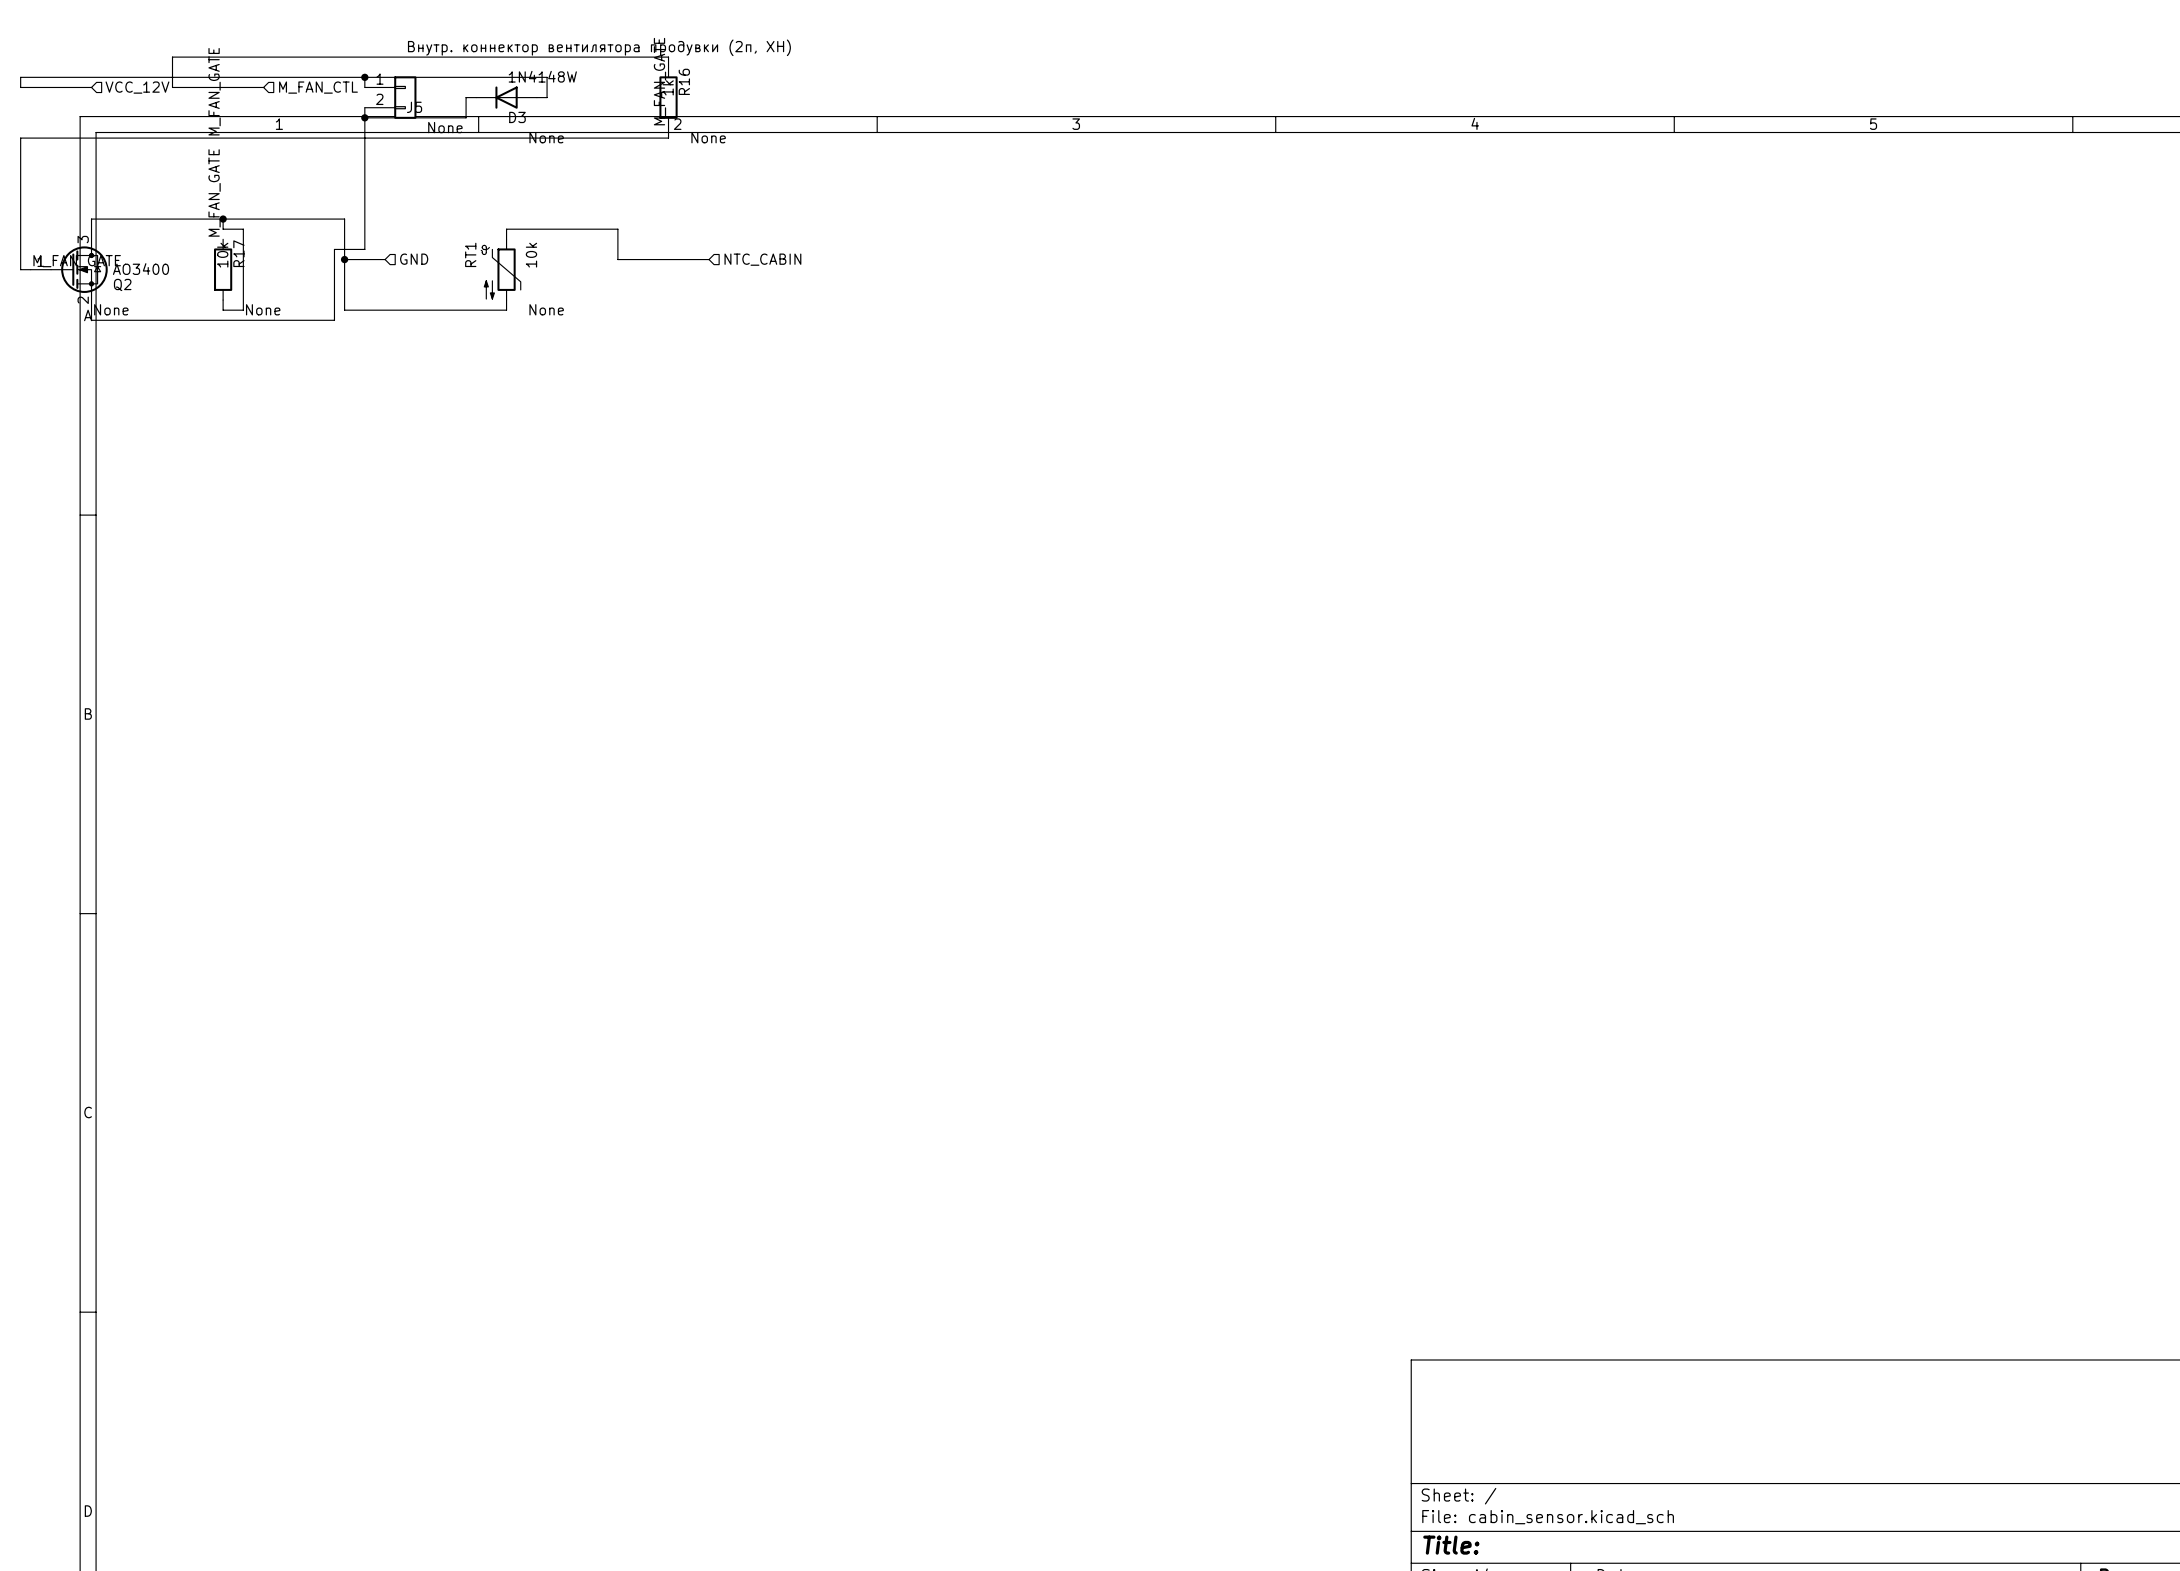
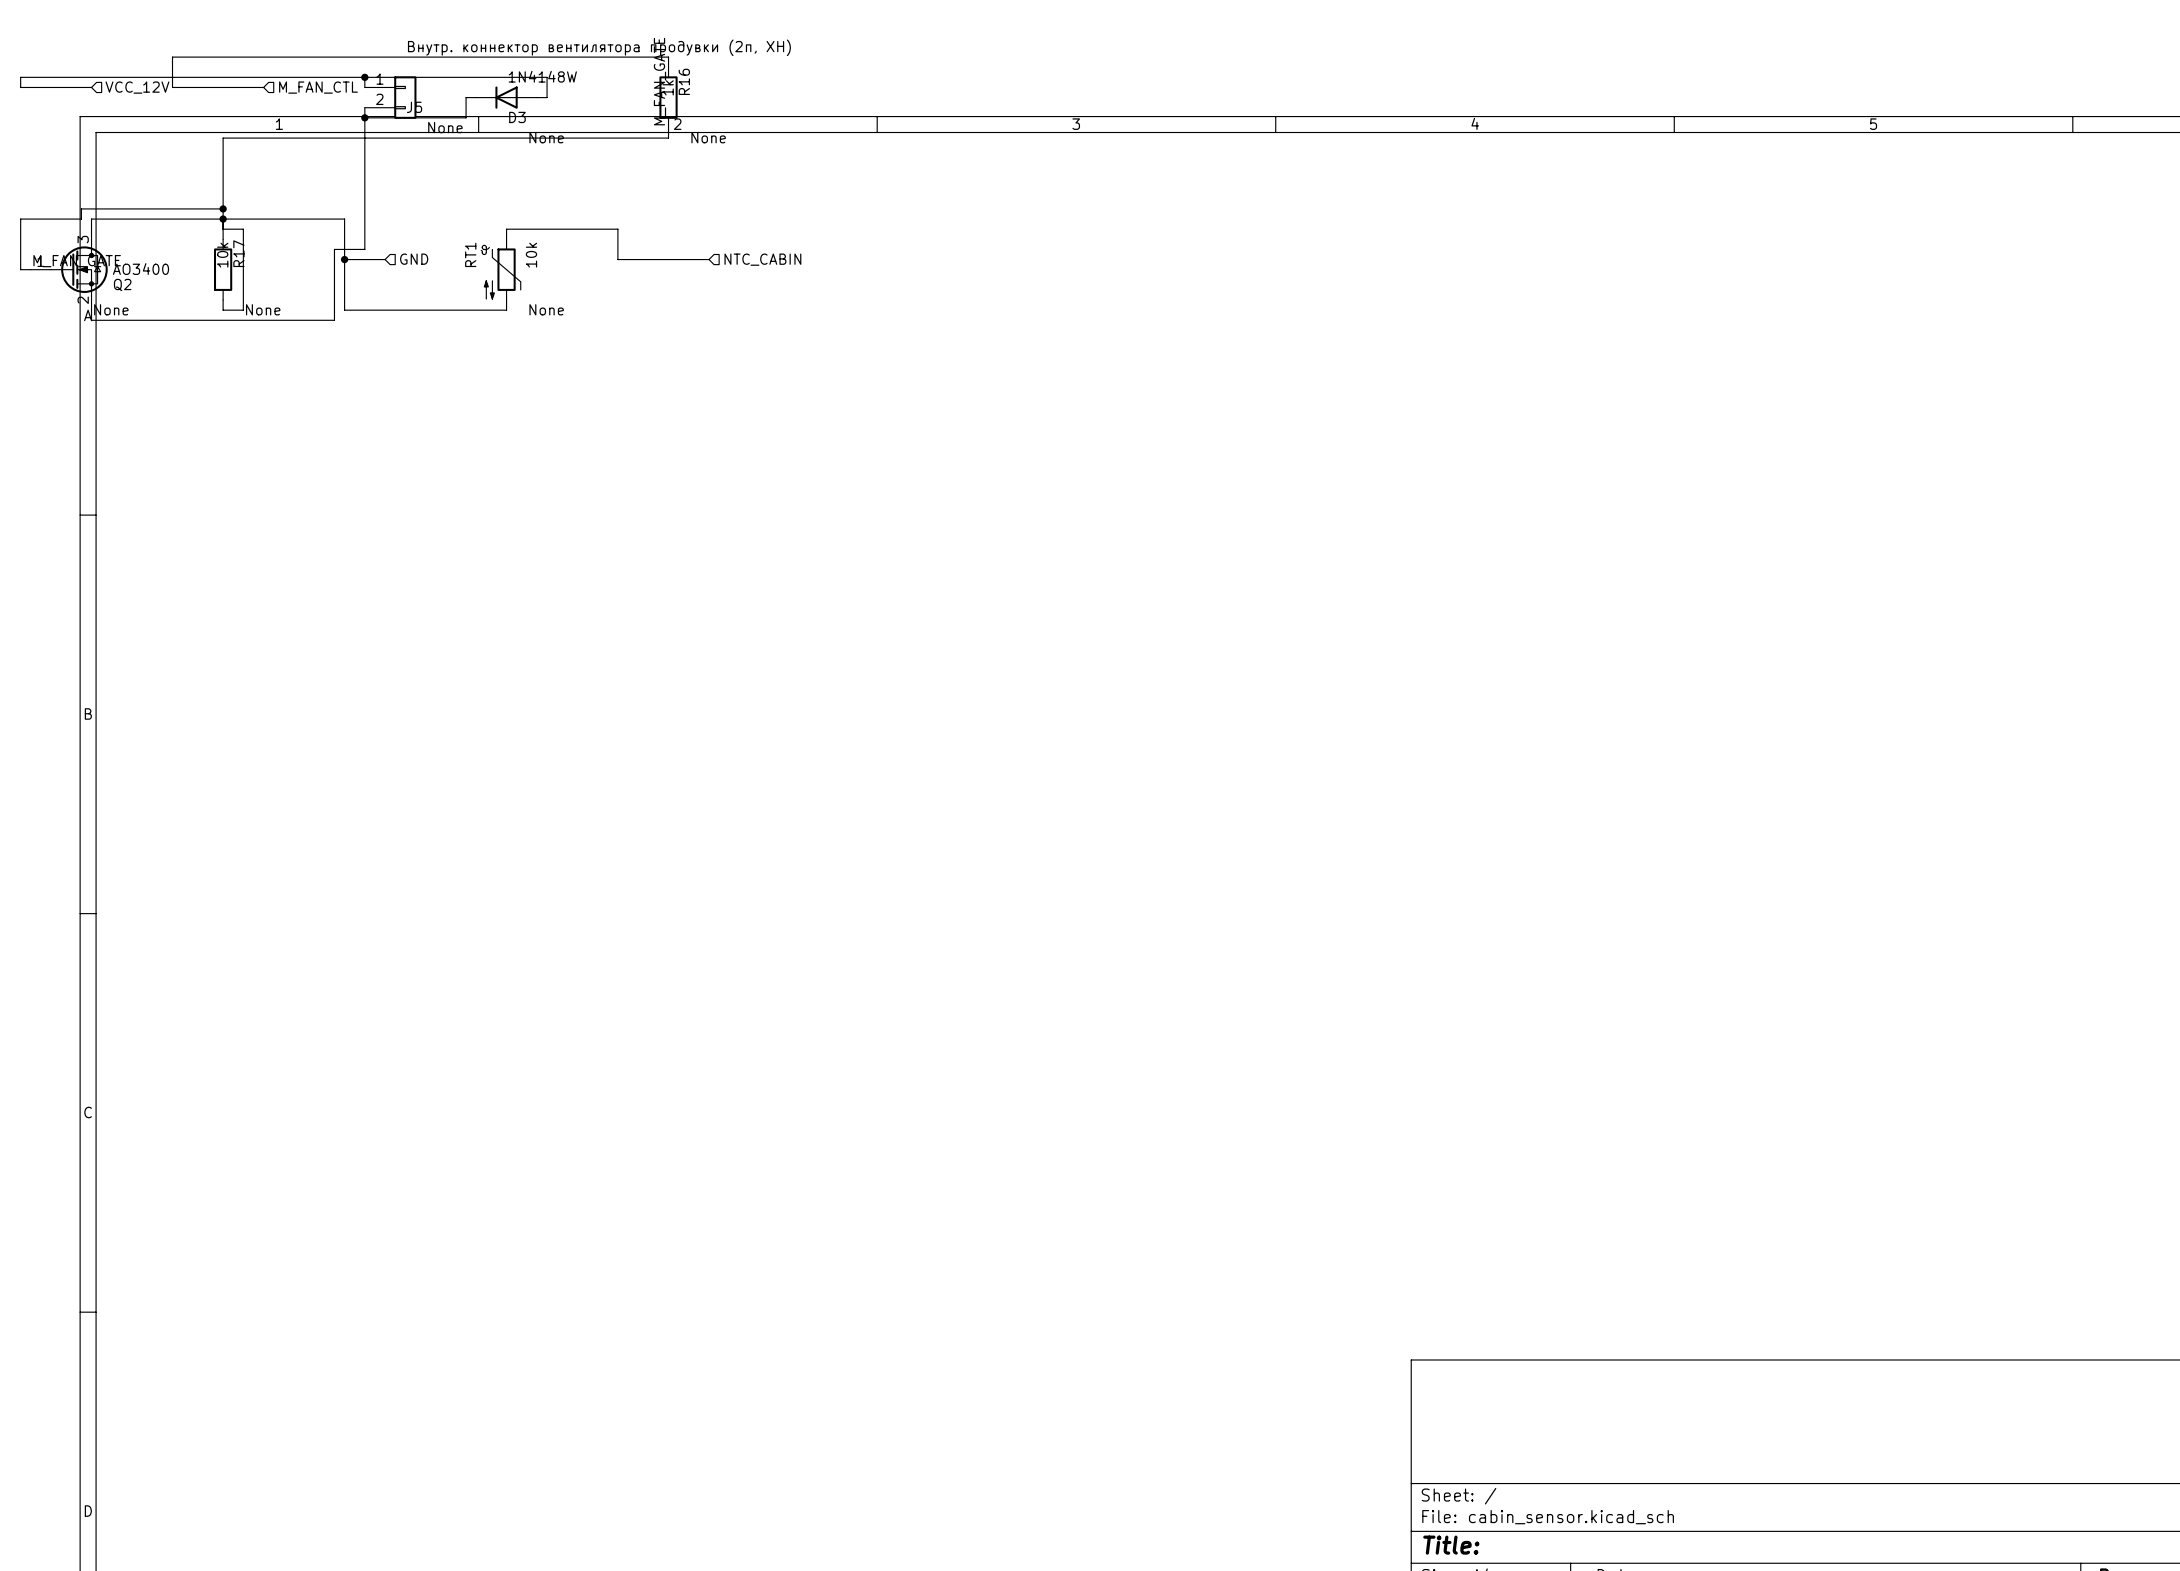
label: M_FAN_GATE (214, 91) -> none
wire: (223, 138) (20, 138) (20, 219) -> (223, 208) (81, 208) (81, 219) (20, 219)
wire: none -> (223, 138) (223, 219)
label: M_FAN_GATE (214, 192) -> none
junction: none -> (223, 208)
wire: none -> (223, 229) (223, 239)

